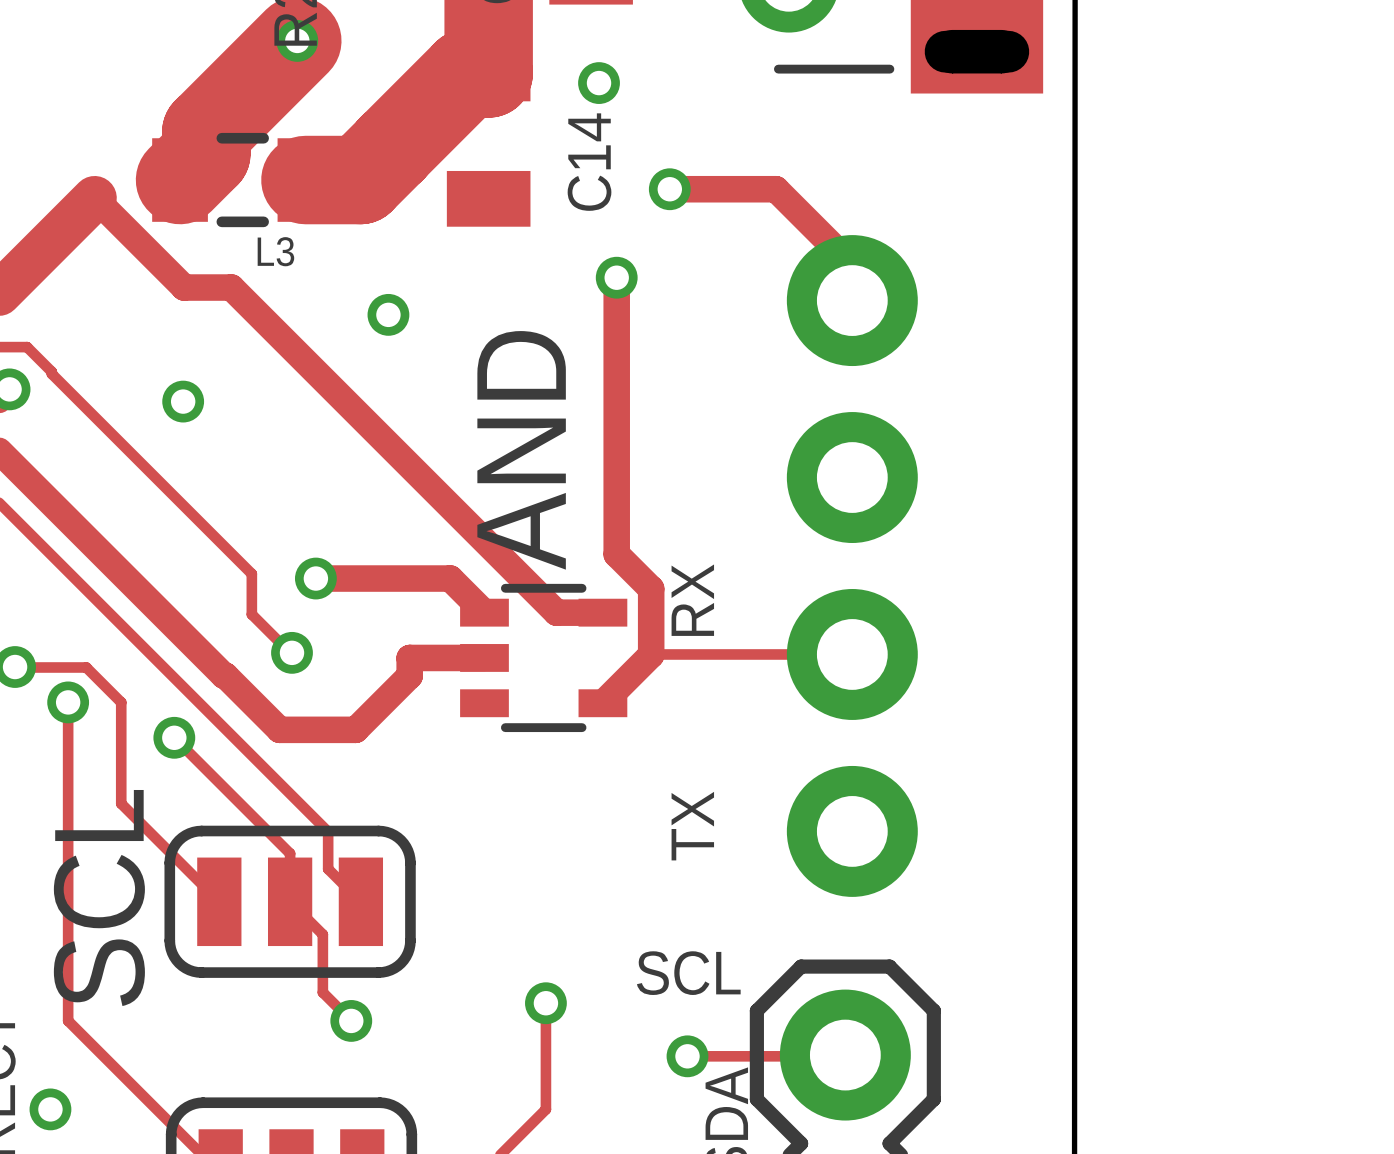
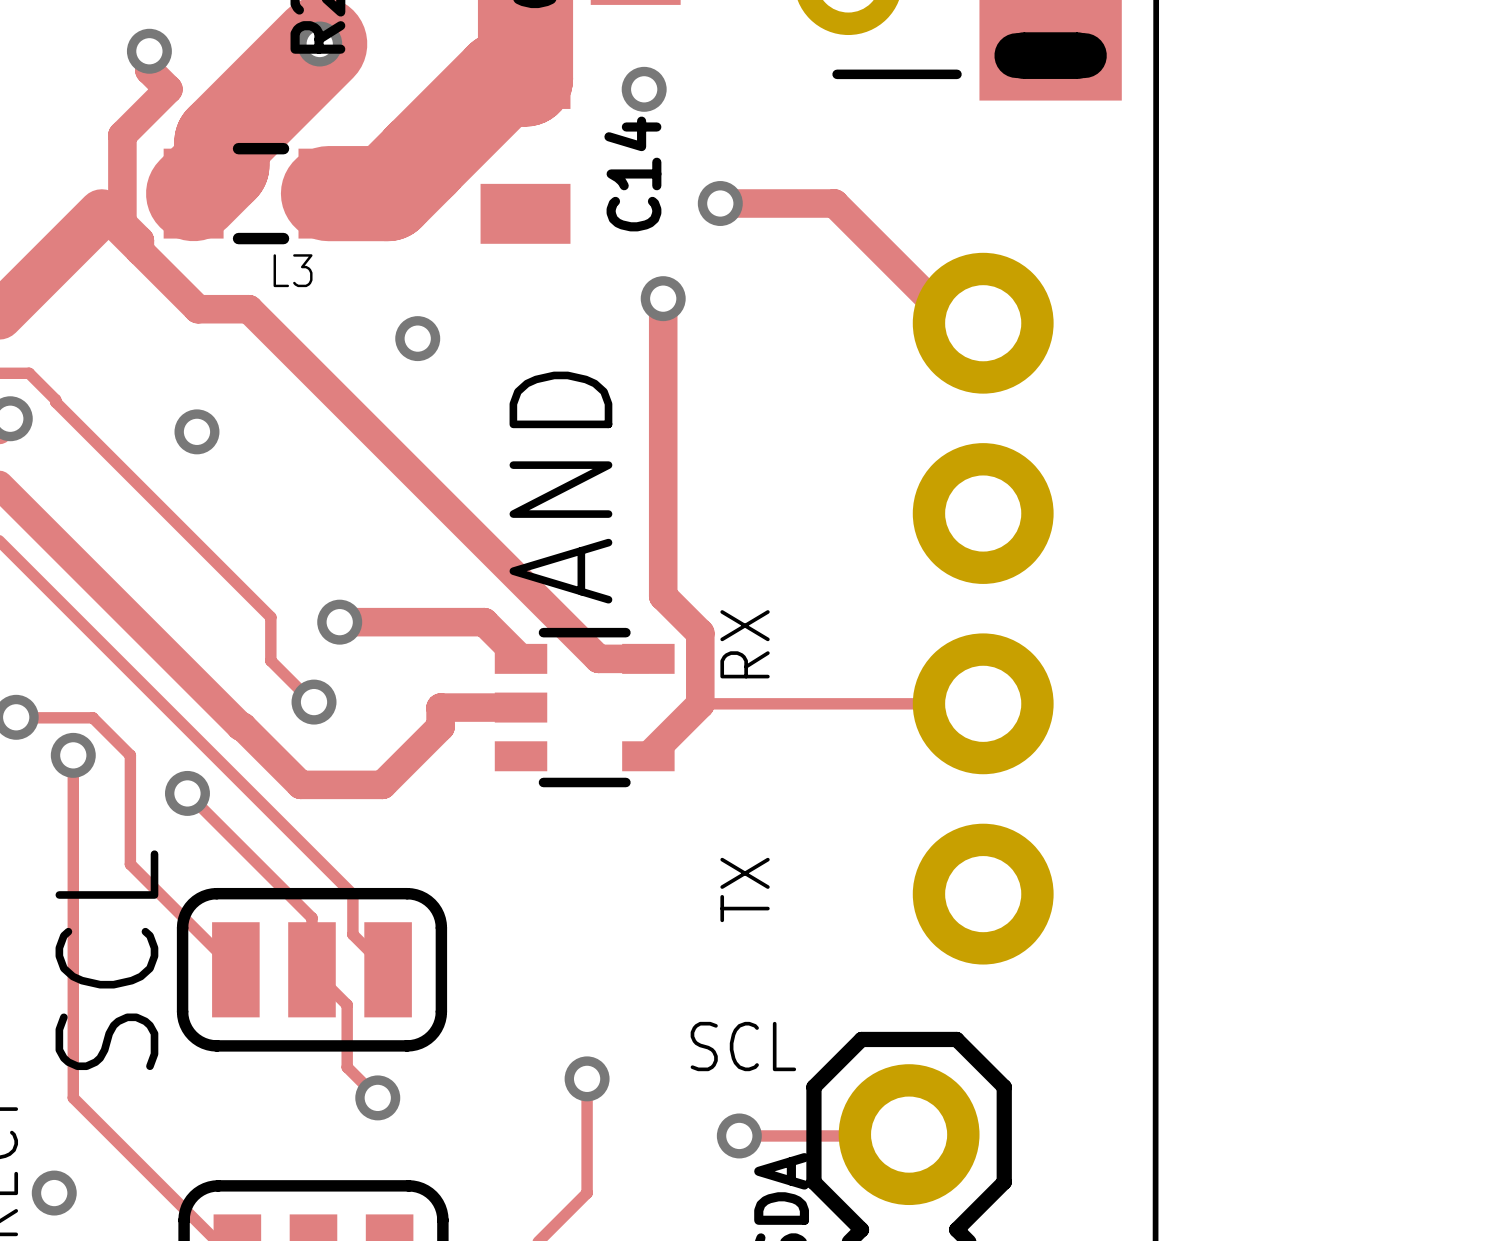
track: none -> (149, 51) (149, 70) (168, 89) (122, 135) (122, 223) (139, 240) (139, 251)
via: none -> (149, 51)
part position: (852, 565) -> (983, 608)

